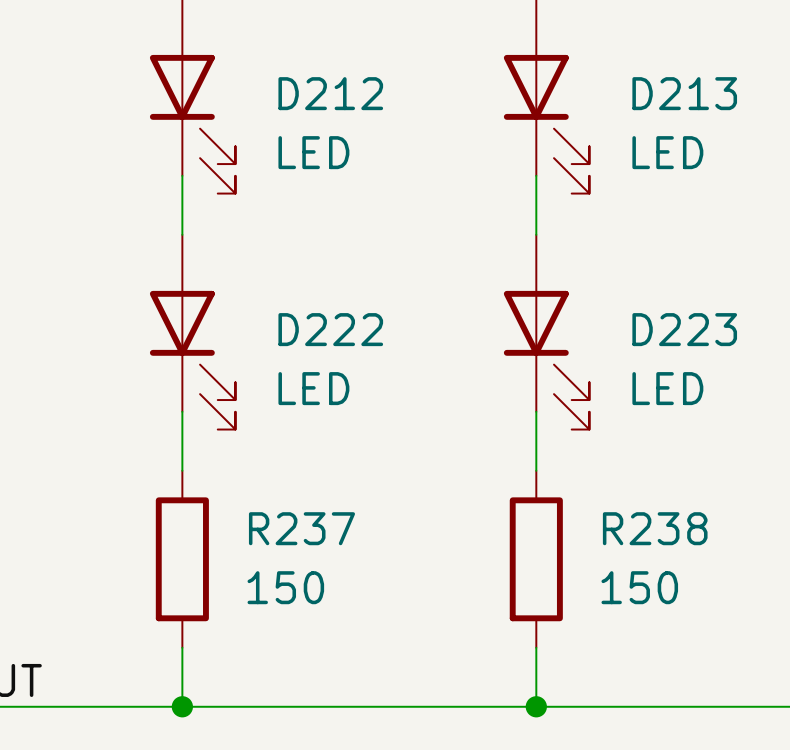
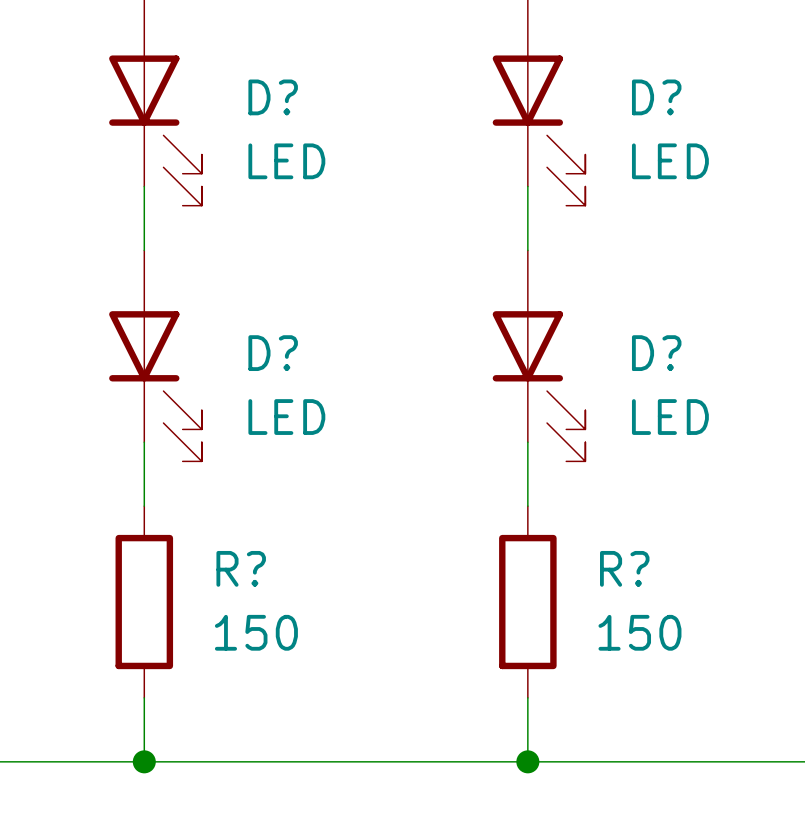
D212 name: D212 (330, 93) -> D? (273, 97)
D213 name: D213 (684, 93) -> D? (656, 97)
D222 name: D222 (330, 329) -> D? (273, 353)
D223 name: D223 (684, 329) -> D? (656, 353)
R237 name: R237 (301, 528) -> R? (241, 568)
R238 name: R238 (655, 528) -> R? (624, 568)

